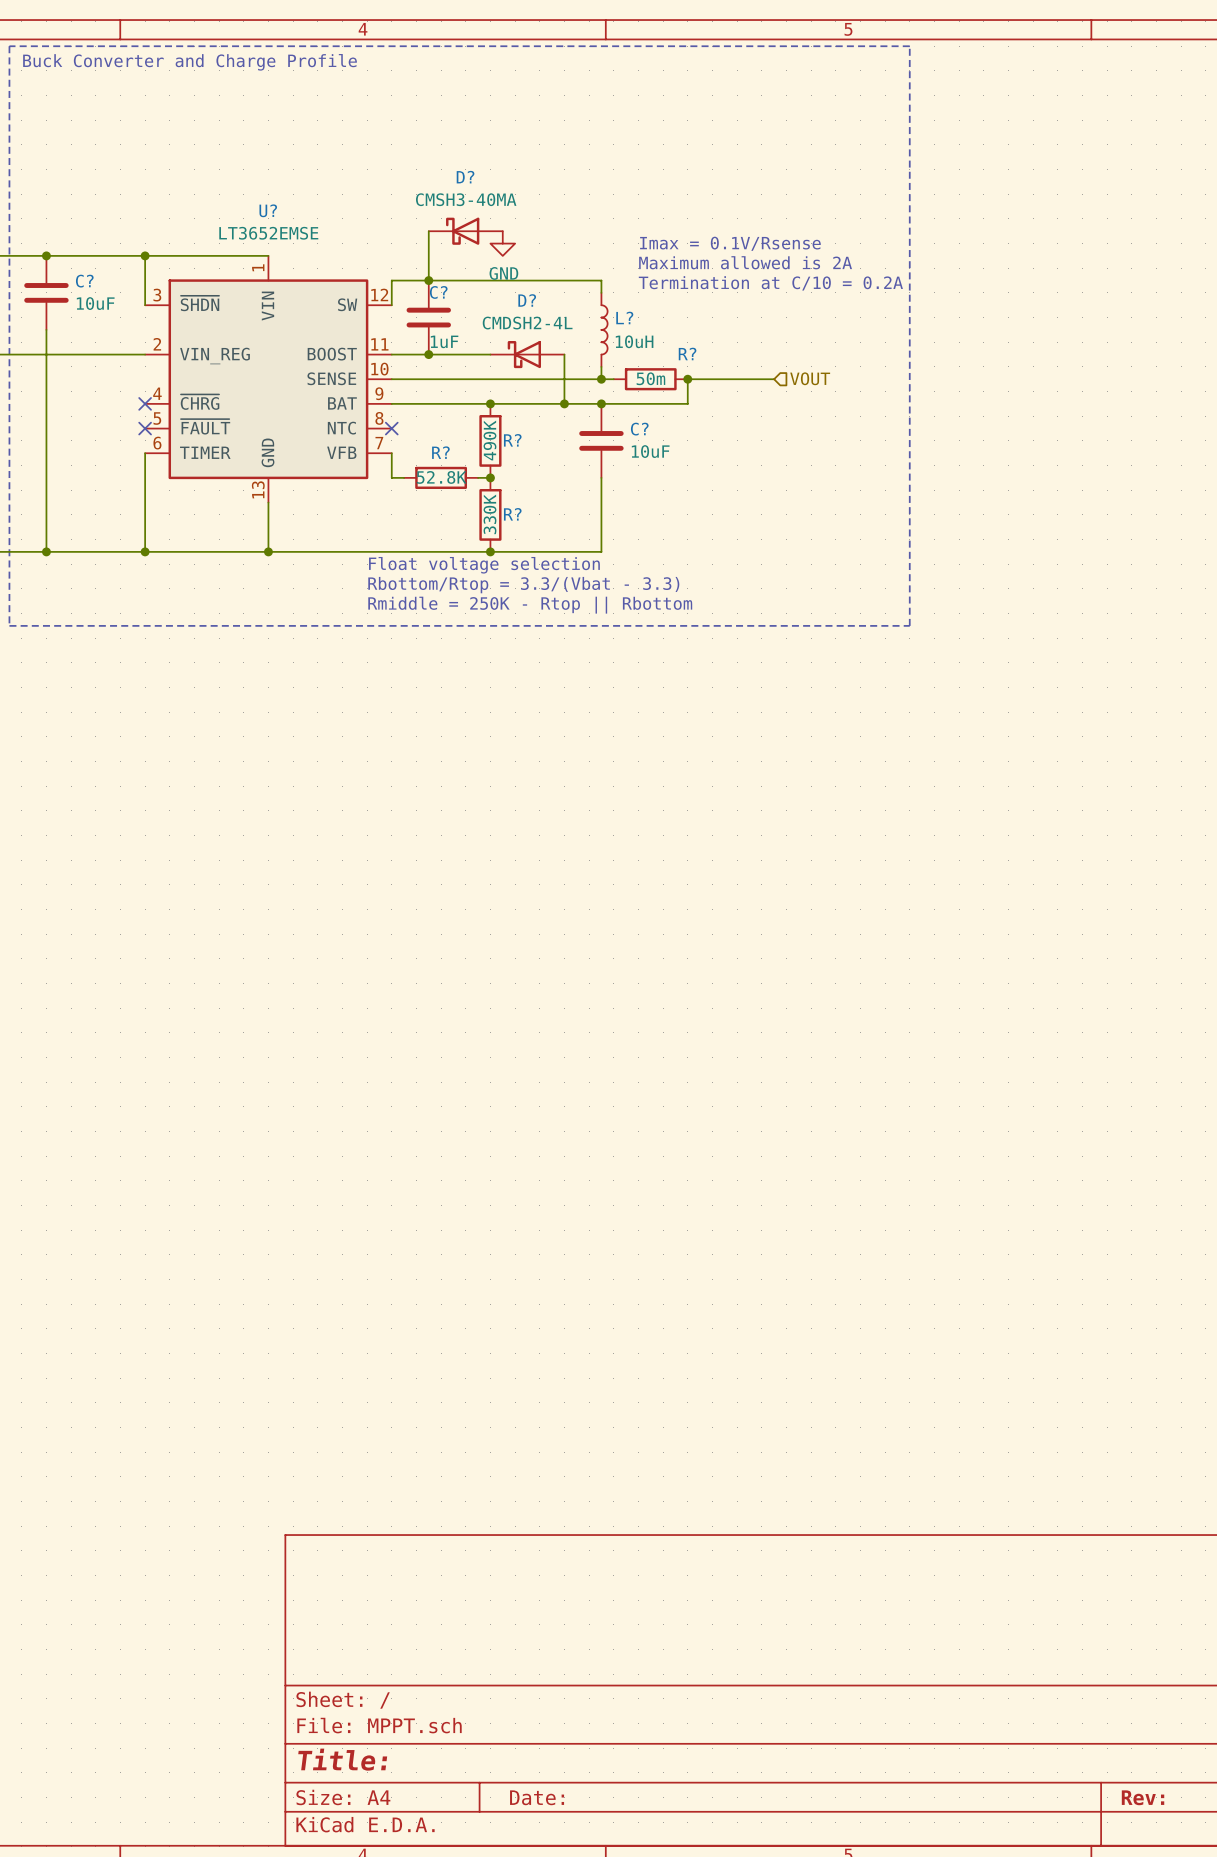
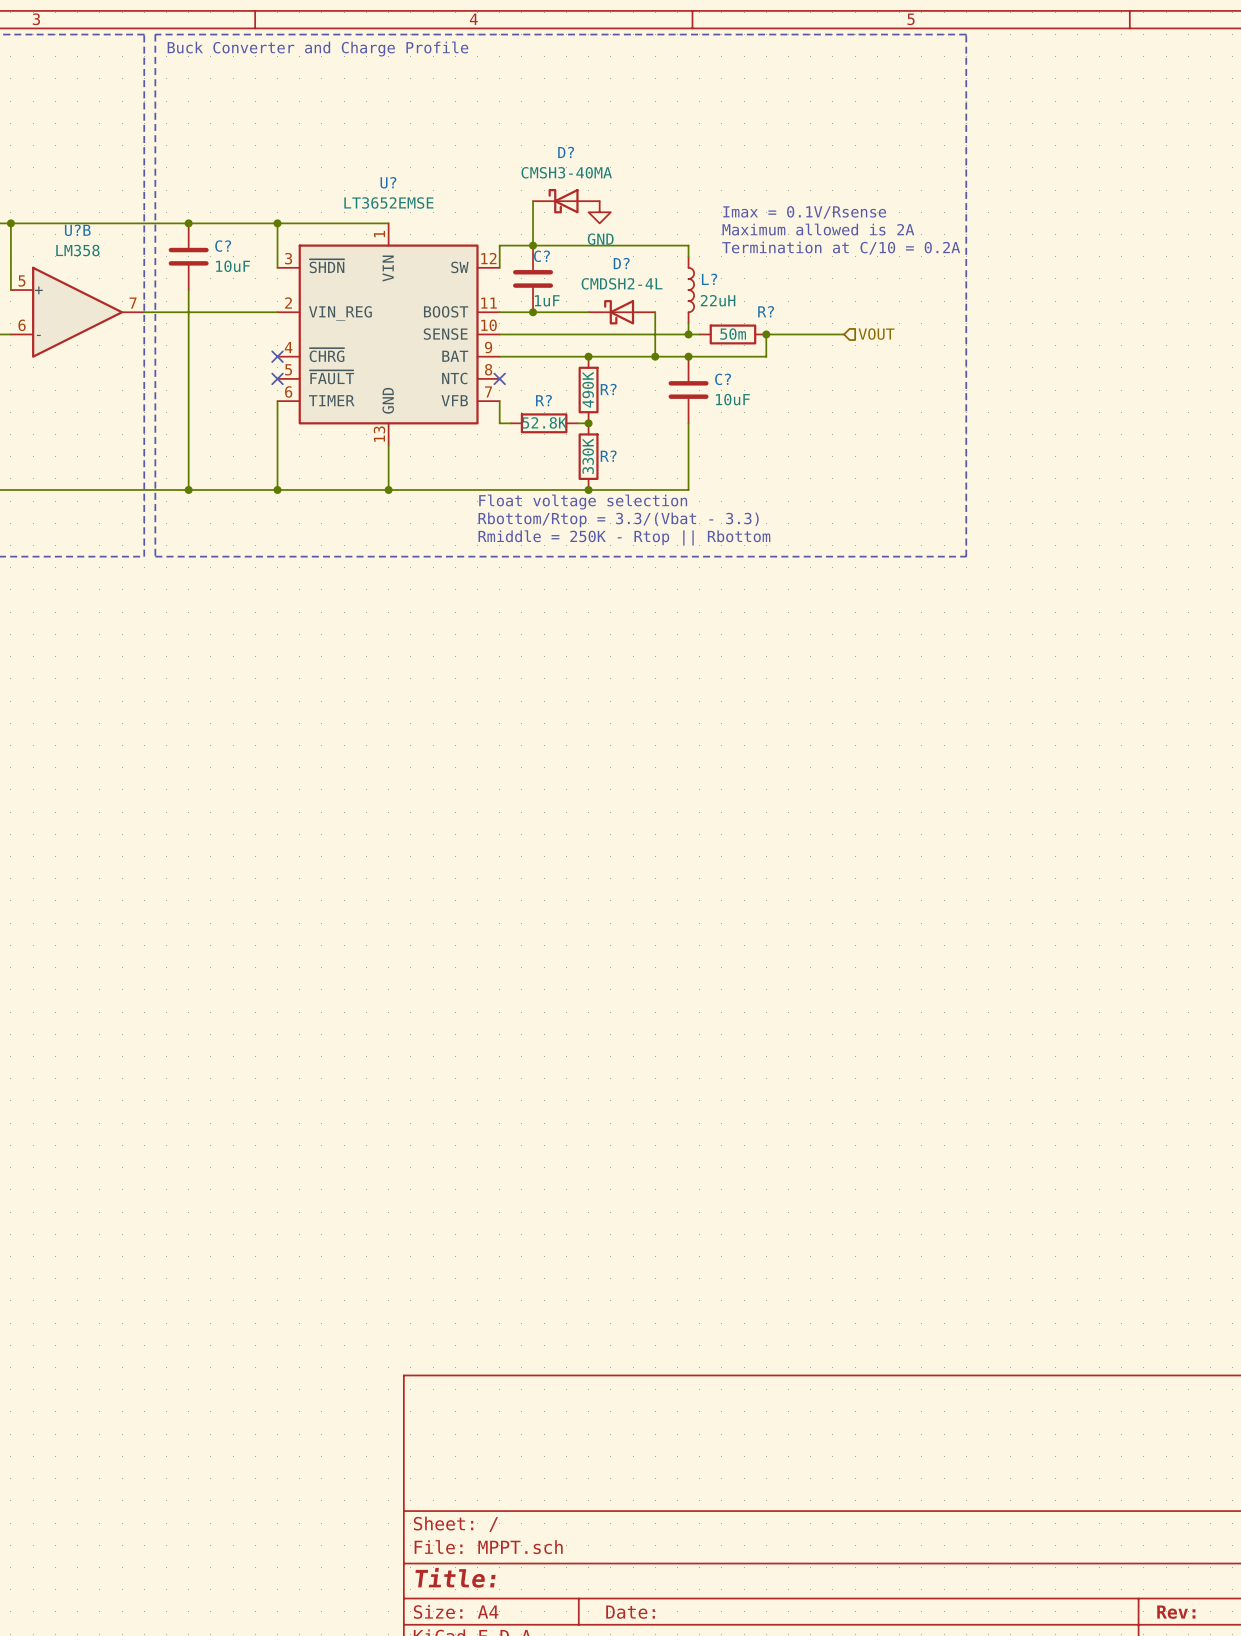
L? value: 10uH (634, 341) -> 22uH (718, 300)

